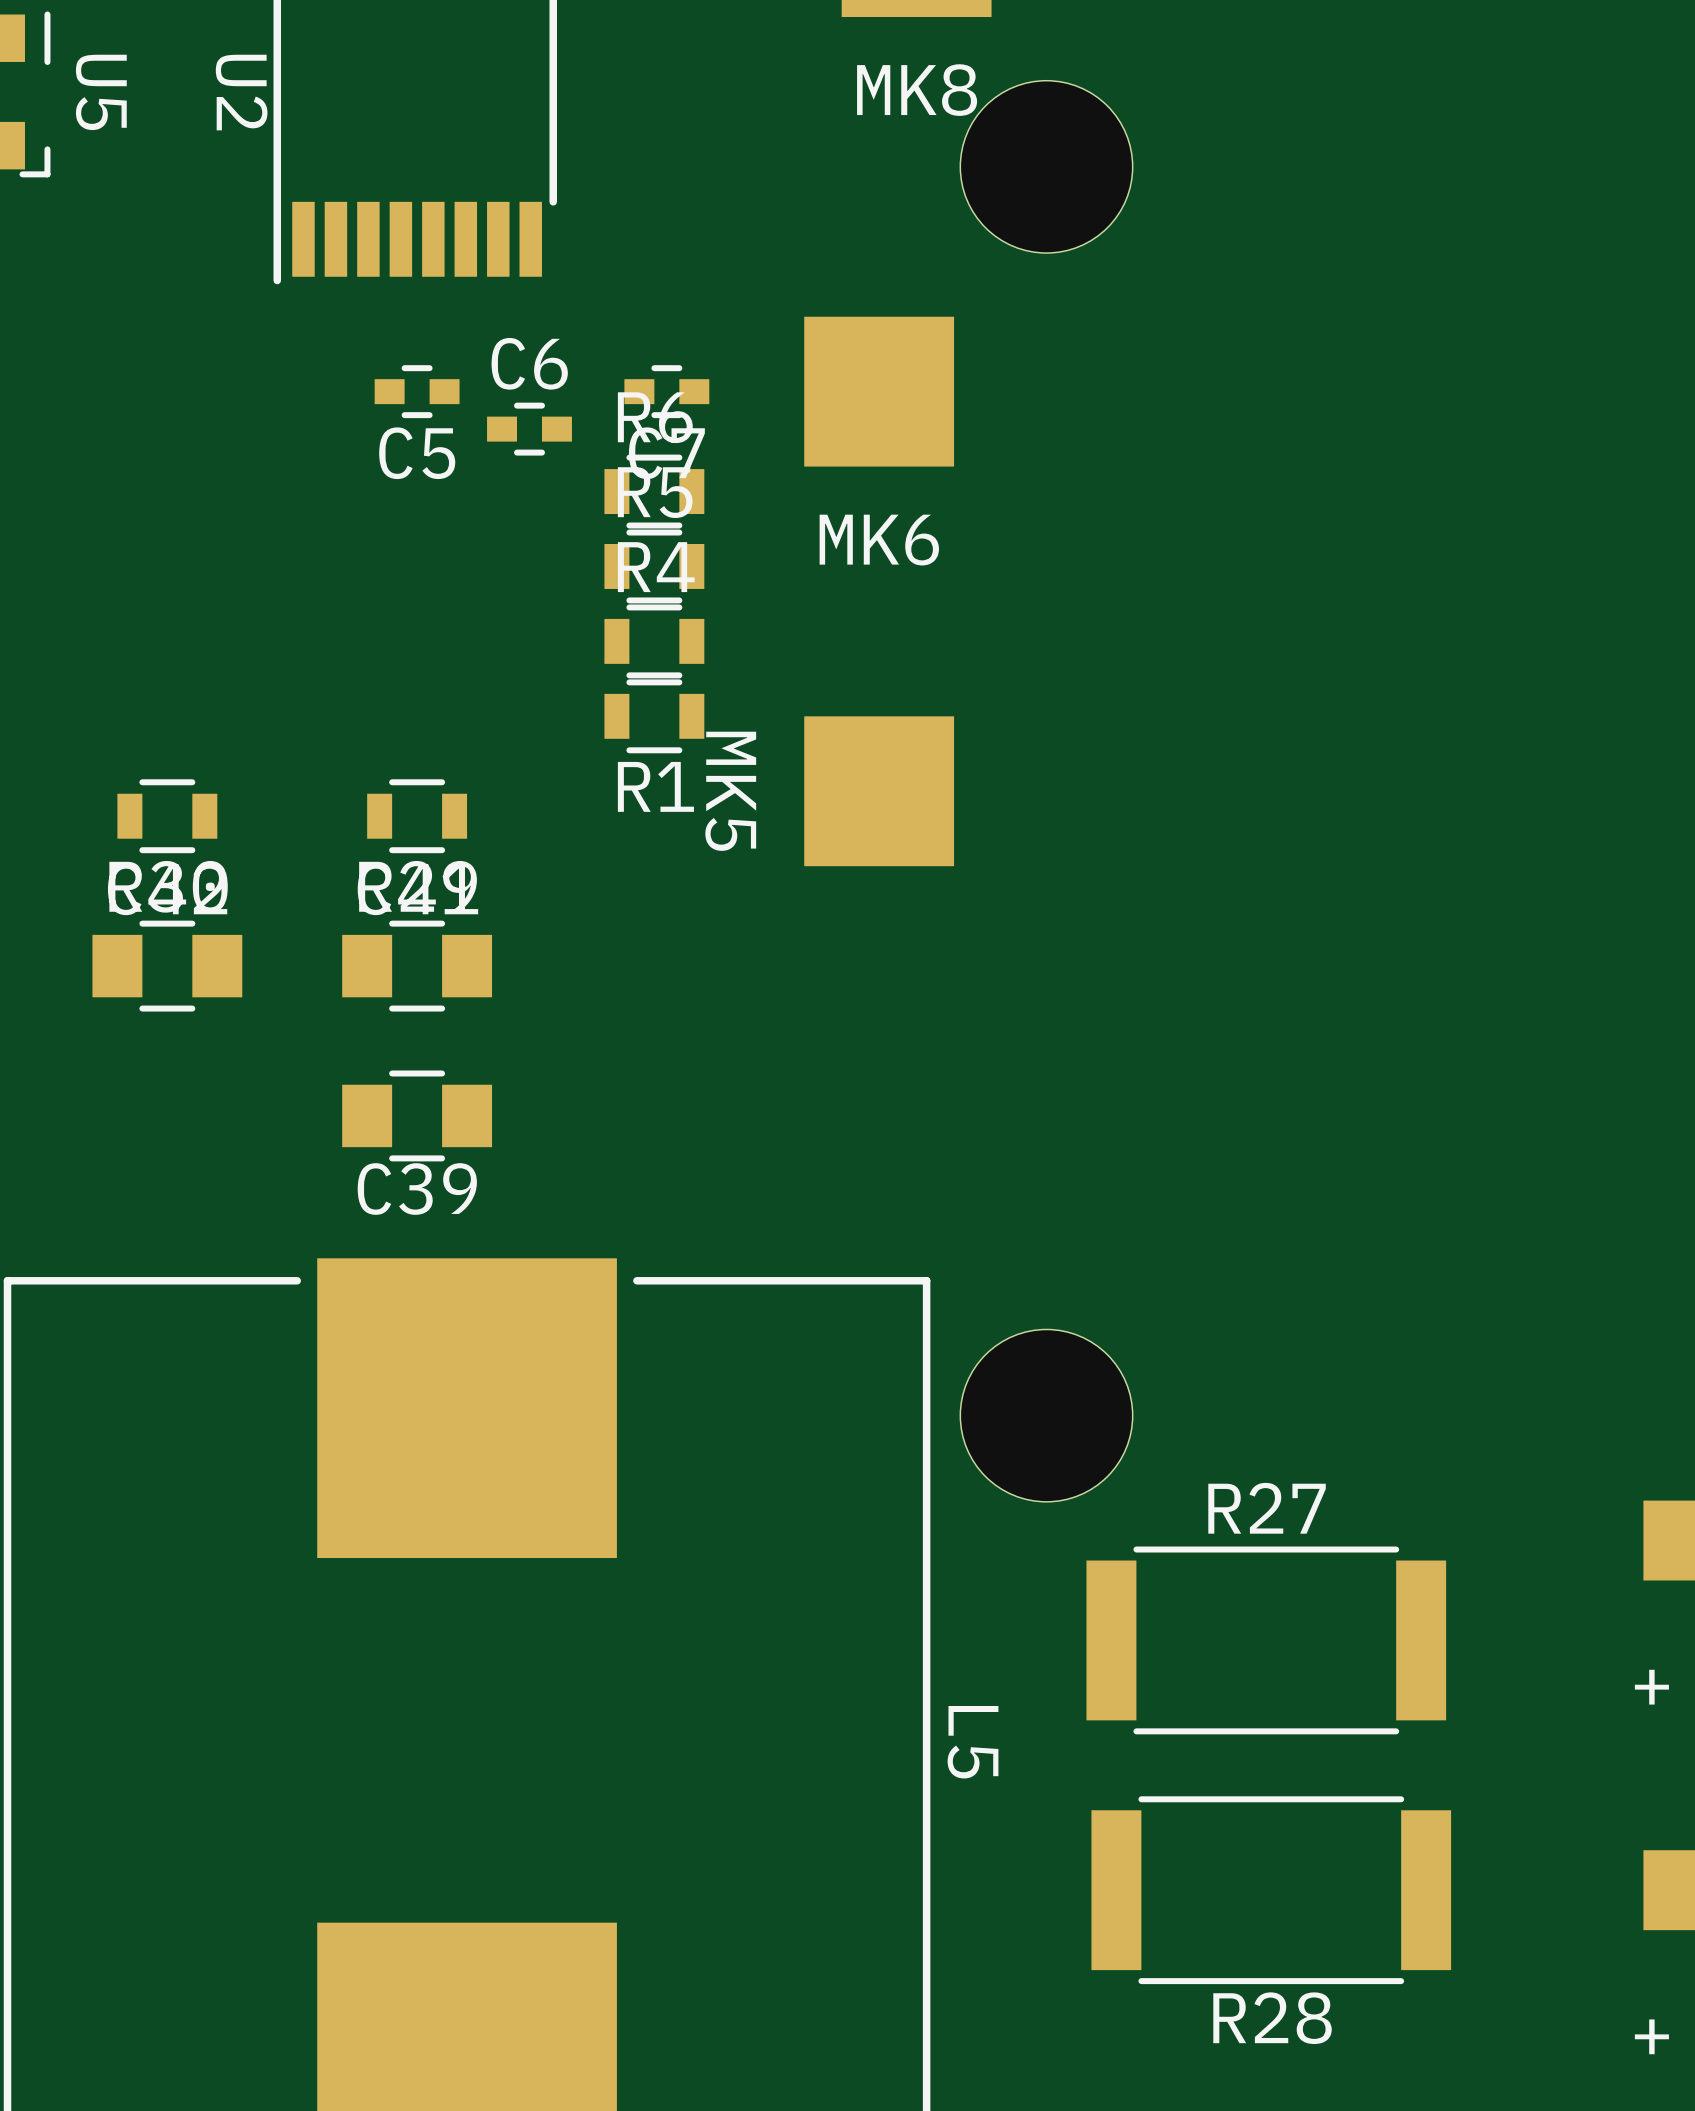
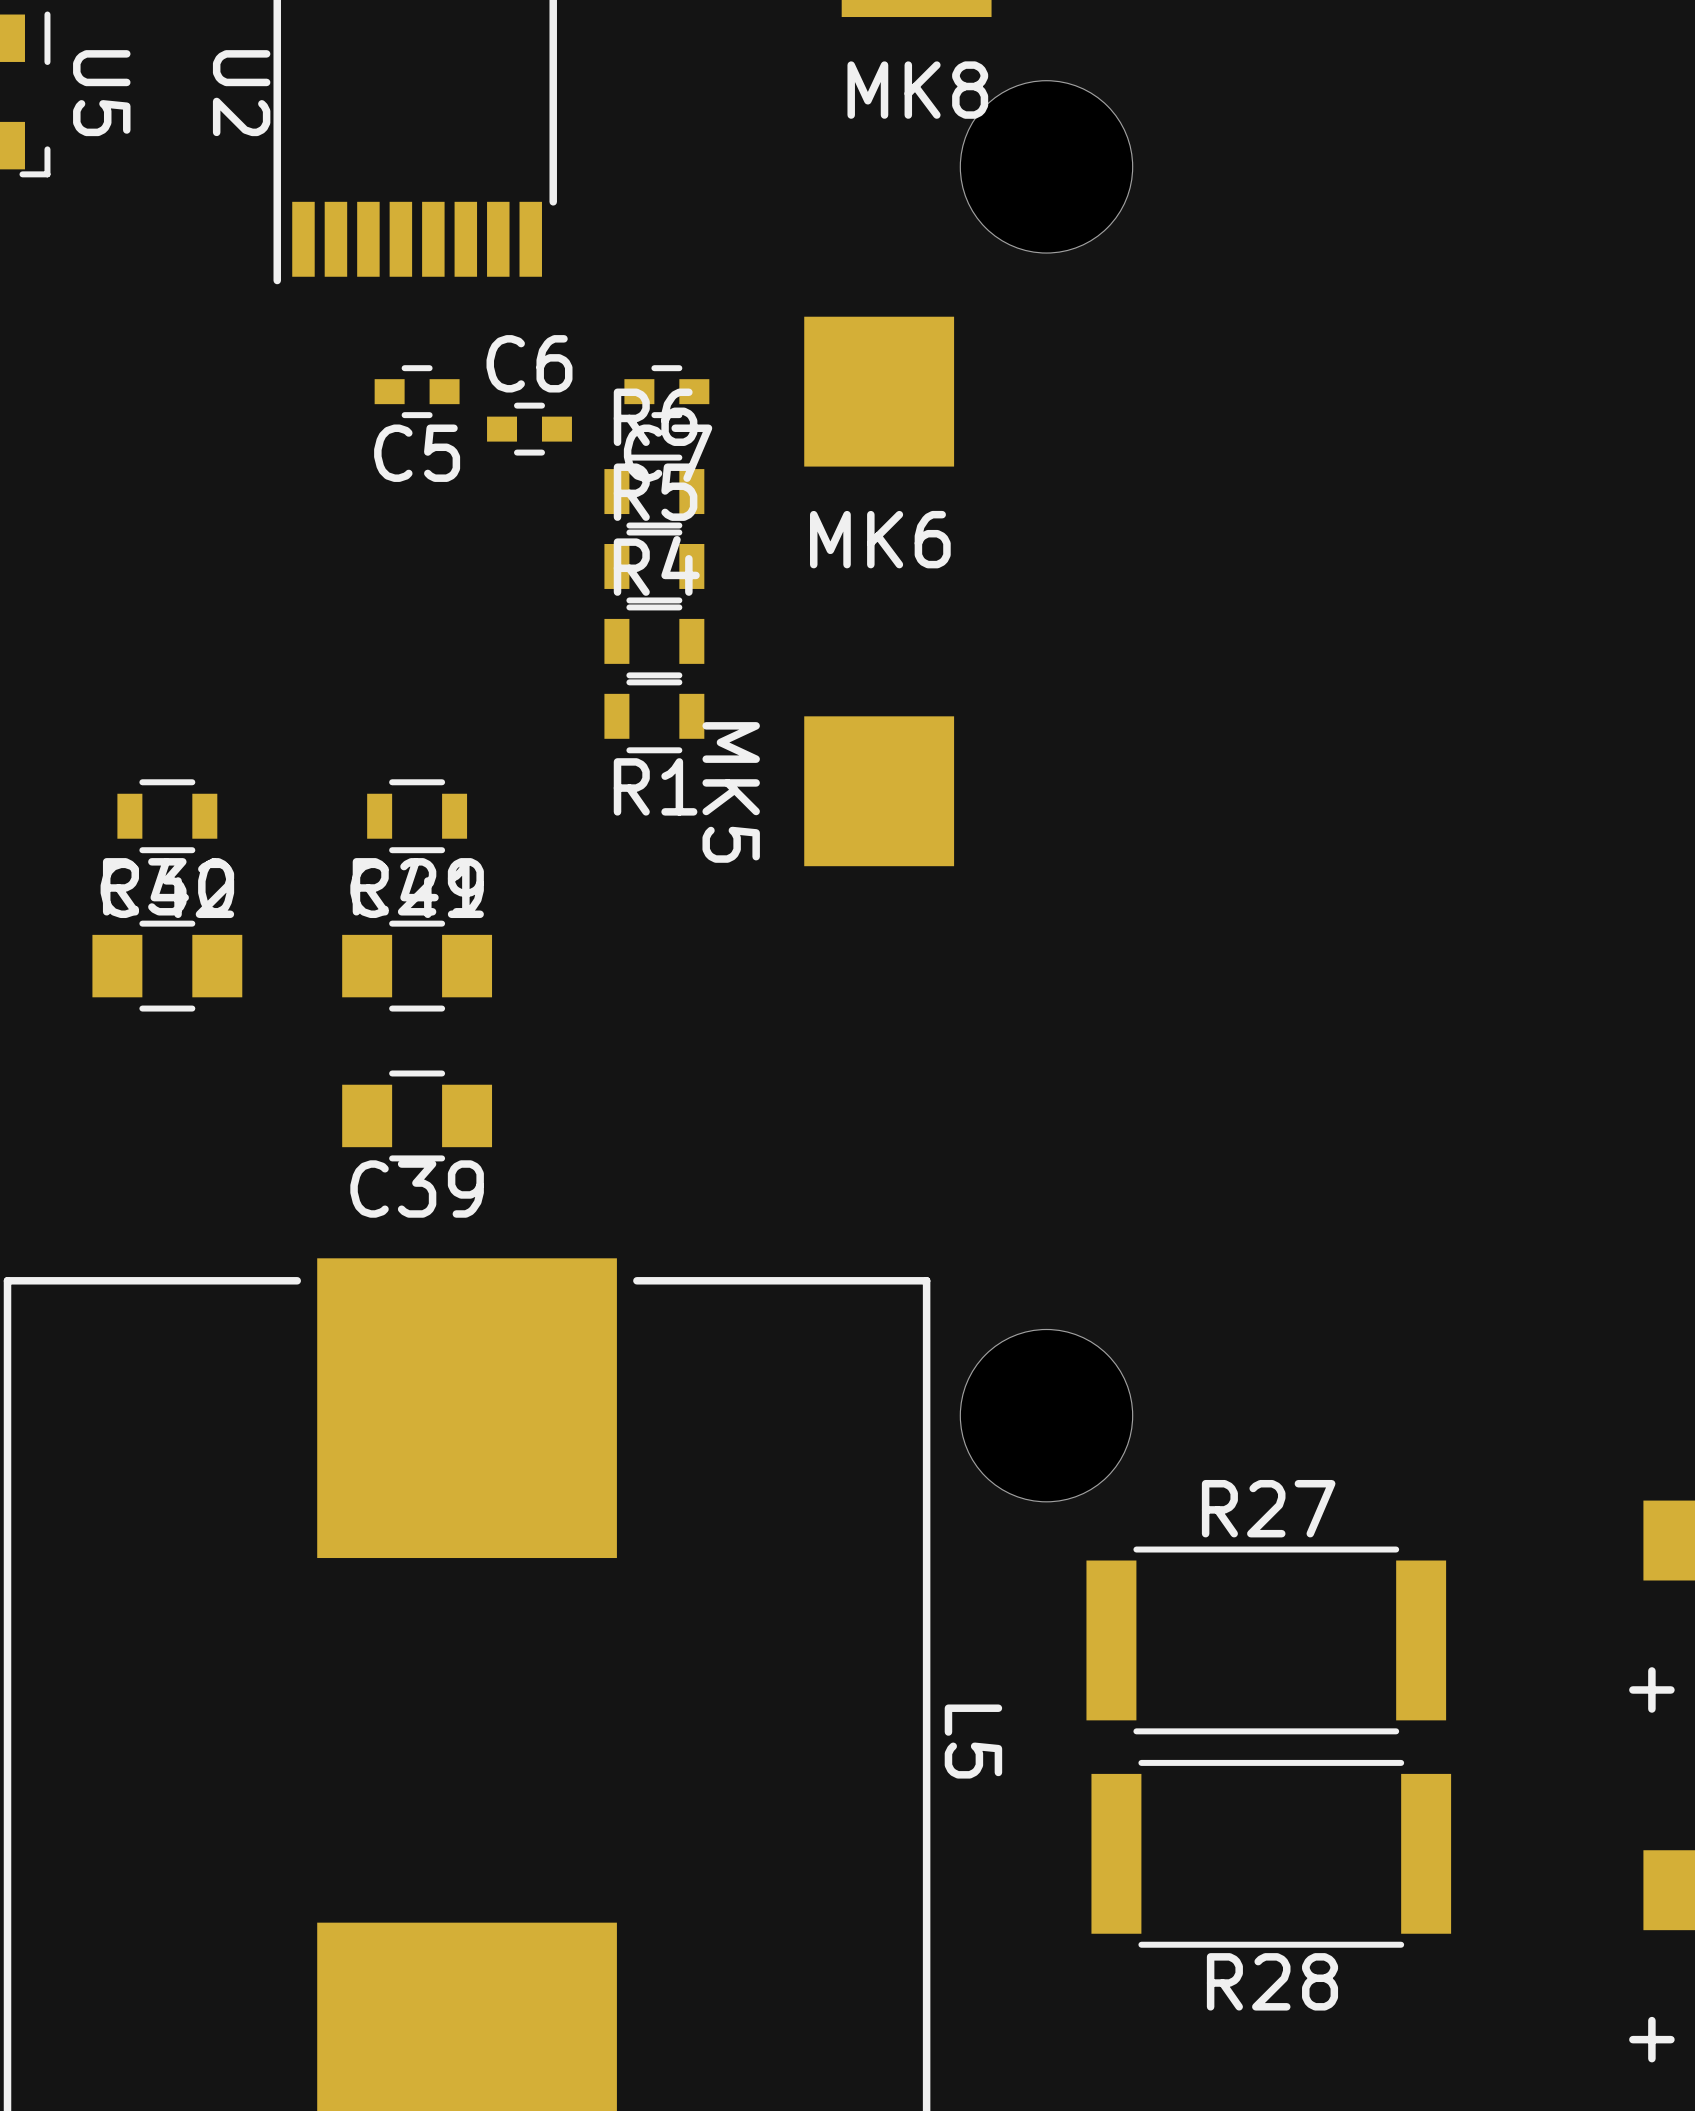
R28 position: (1271, 1890) -> (1271, 1853)

